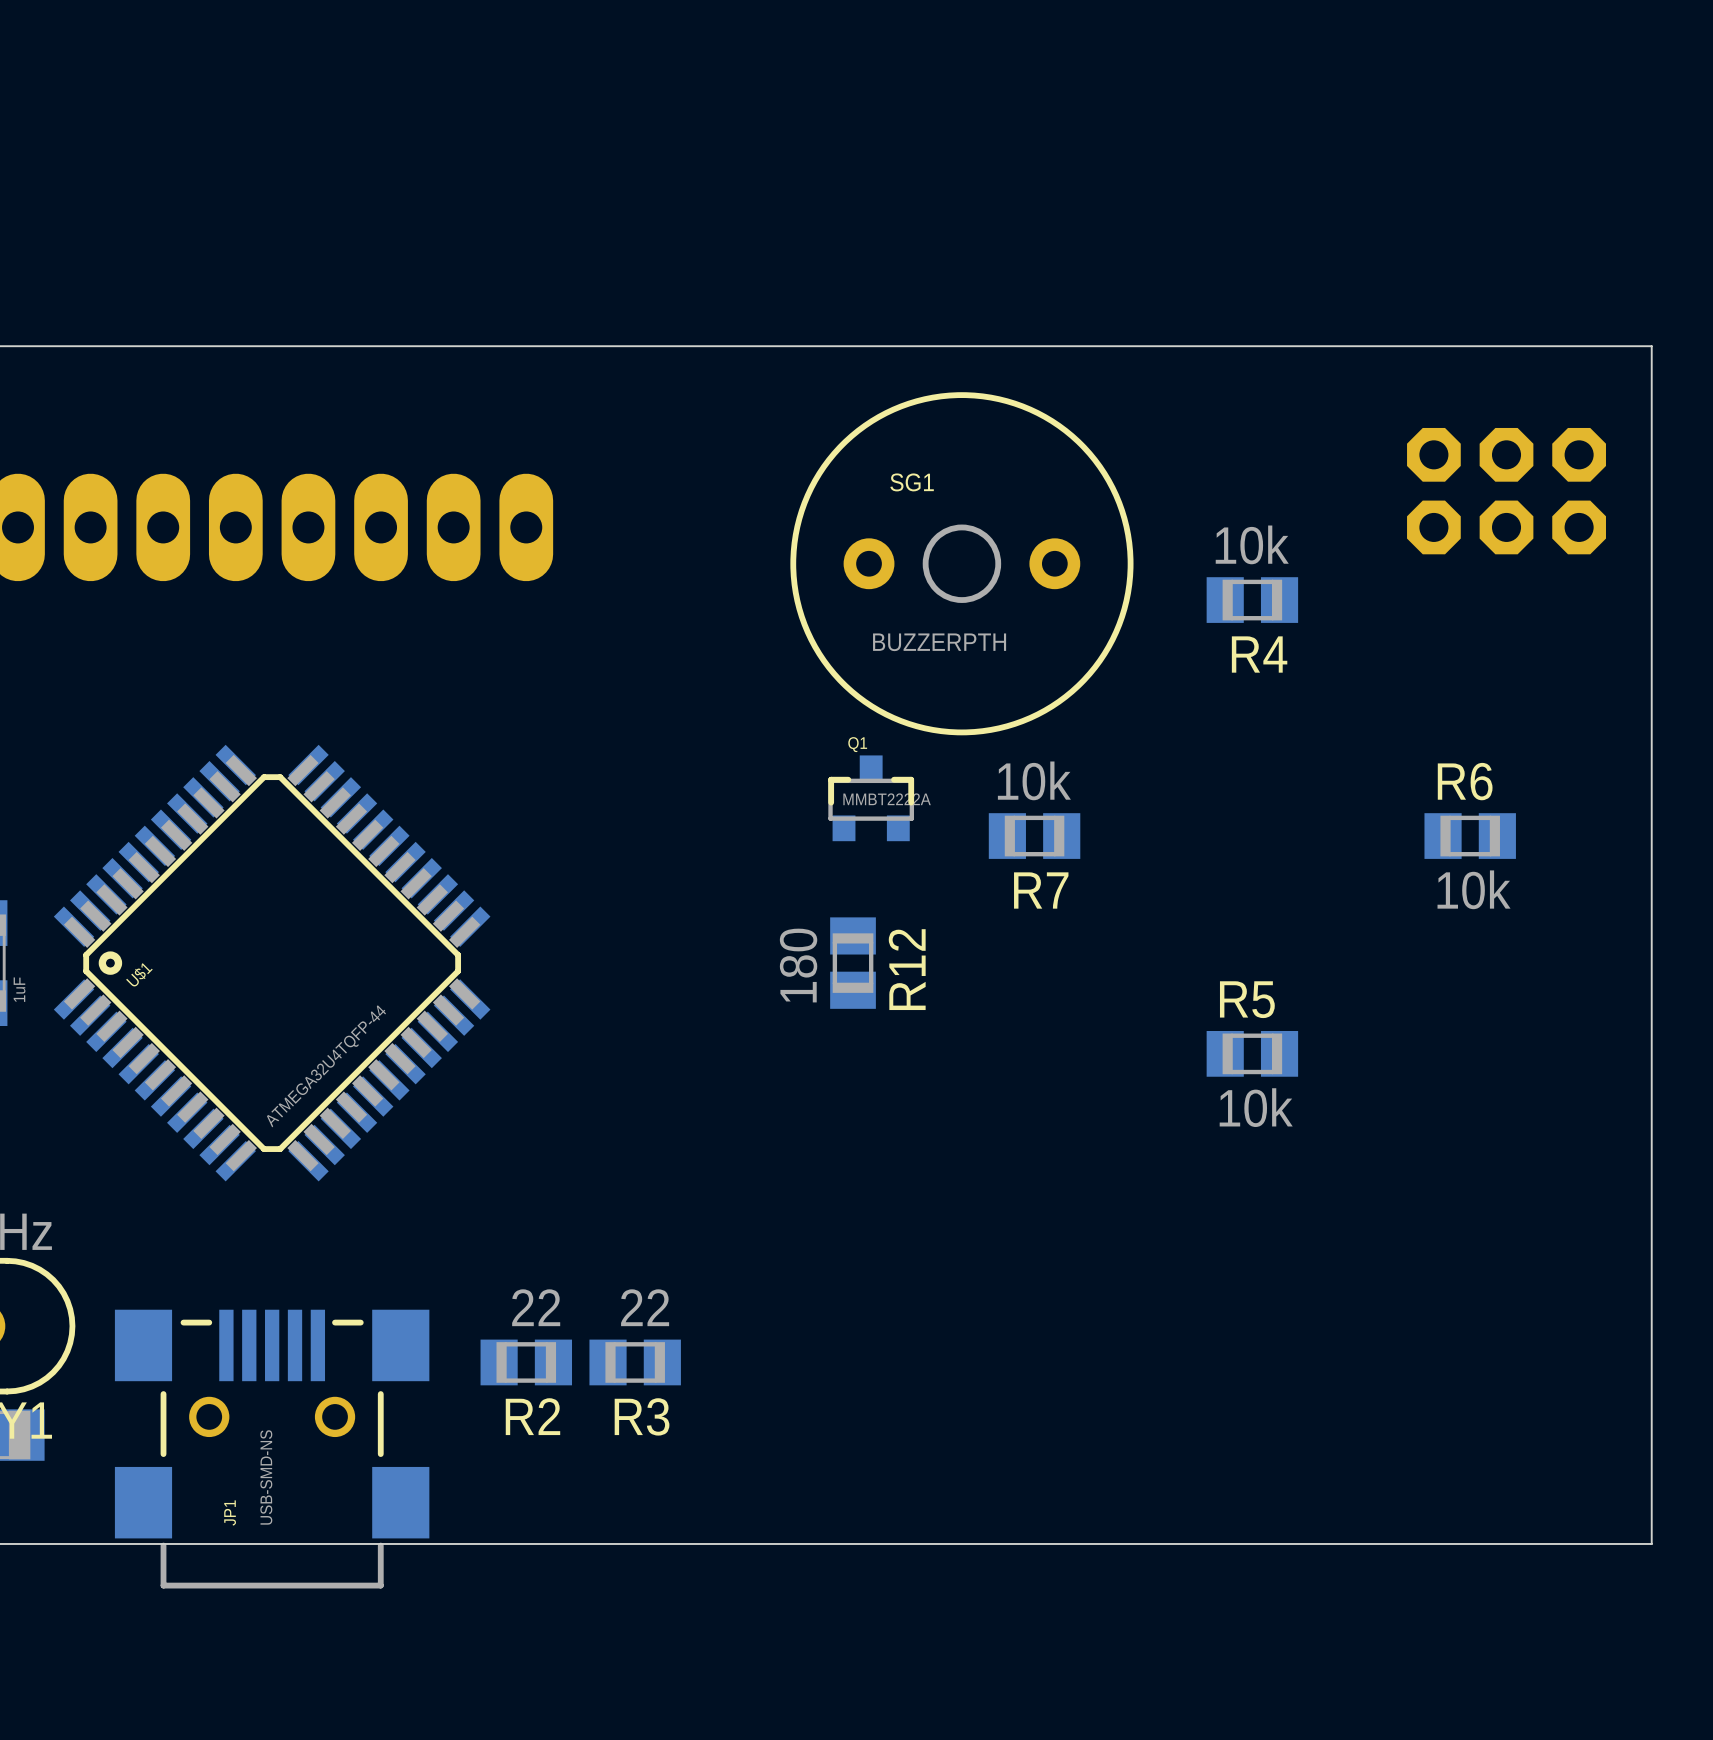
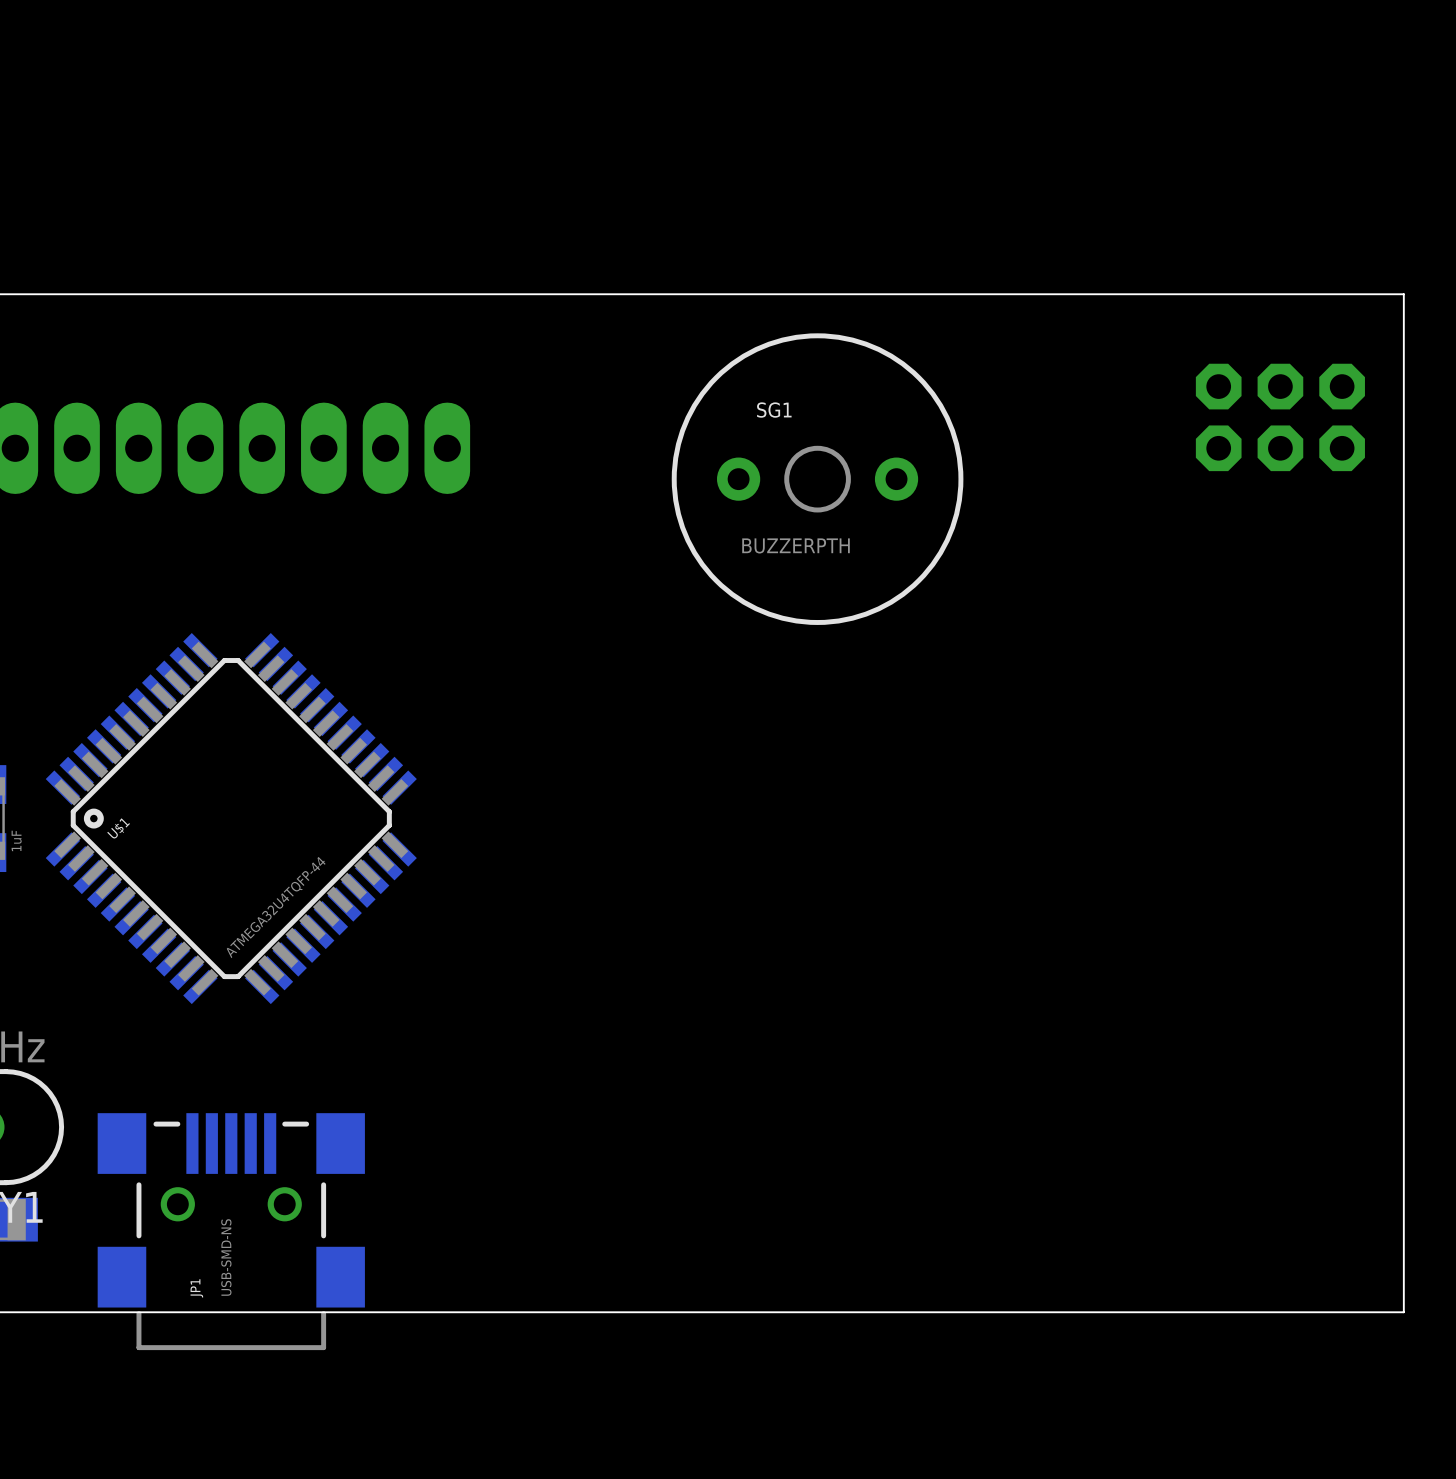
R4: 10k (1252, 600) -> none
Q1: MMBT2222A (871, 798) -> none
R7: 10k (1034, 836) -> none
R6: 10k (1470, 836) -> none
R12: 180 (853, 963) -> none
R5: 10k (1252, 1053) -> none
R2: 22 (526, 1362) -> none
R3: 22 (635, 1362) -> none

